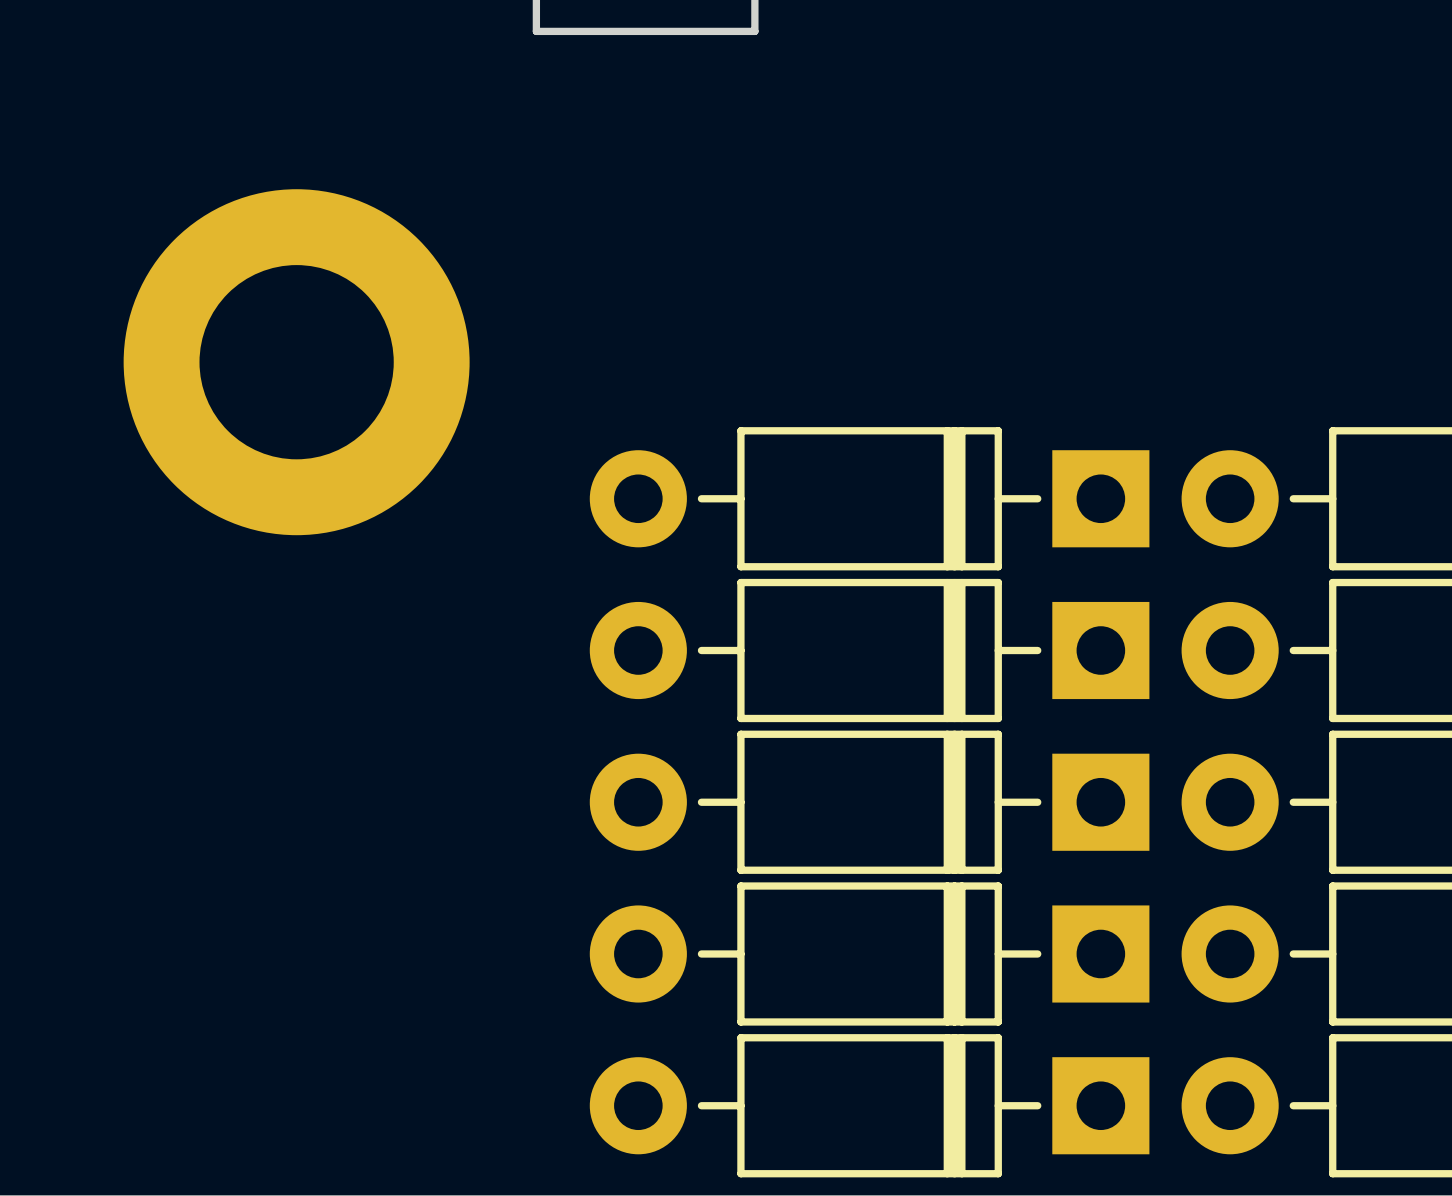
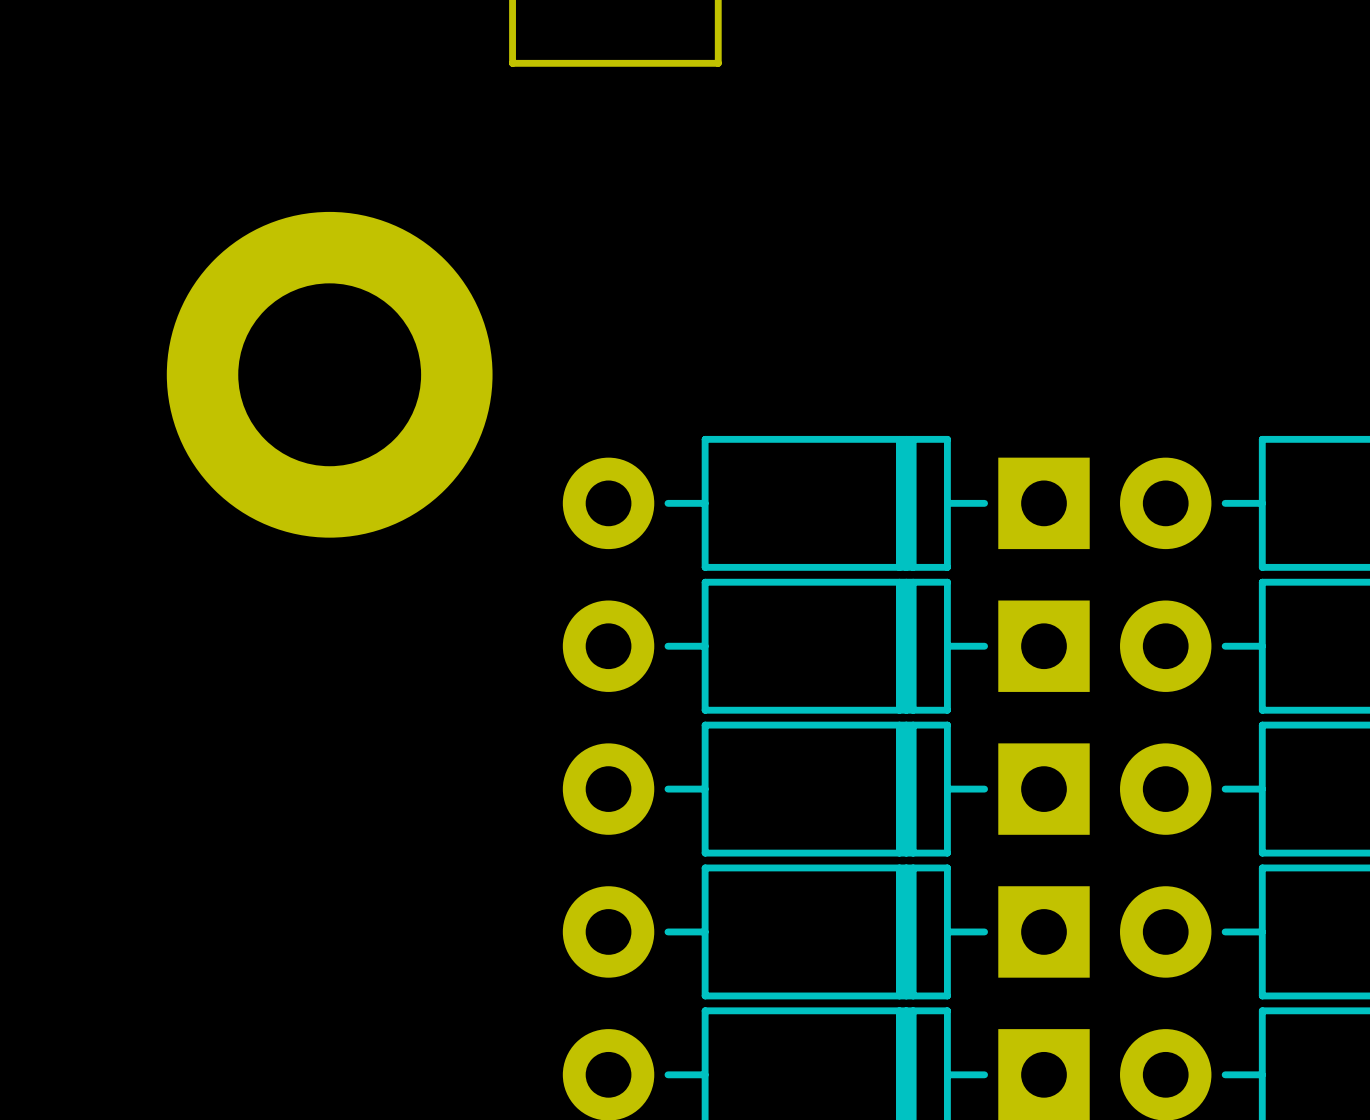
part position: (296, 362) -> (329, 374)

